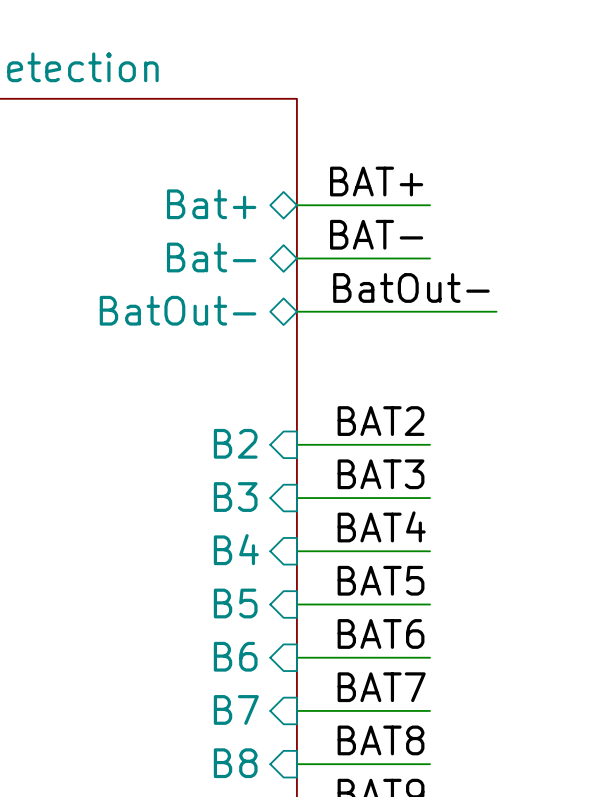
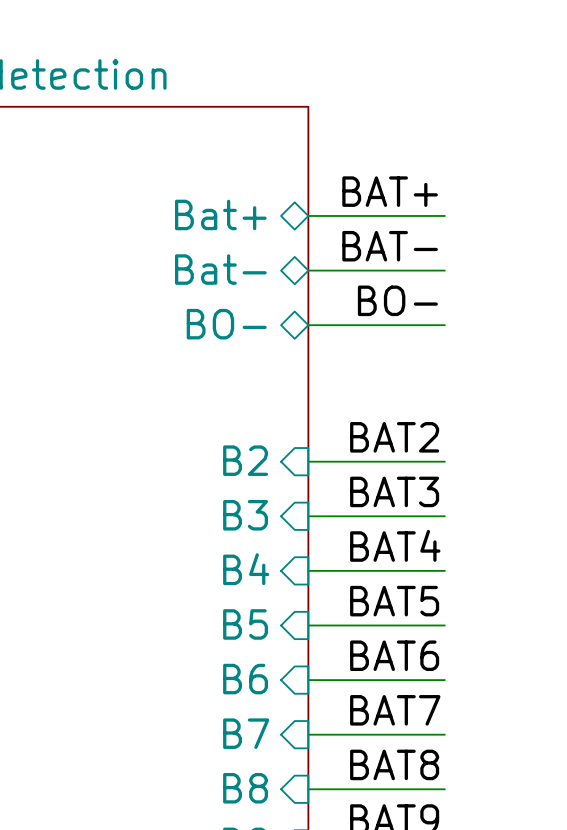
label: none -> BO- (397, 300)
label: BatOut- (411, 287) -> none
sheet pin: BatOut- (178, 310) -> BO- (226, 324)
wire: (430, 311) (496, 311) -> none

